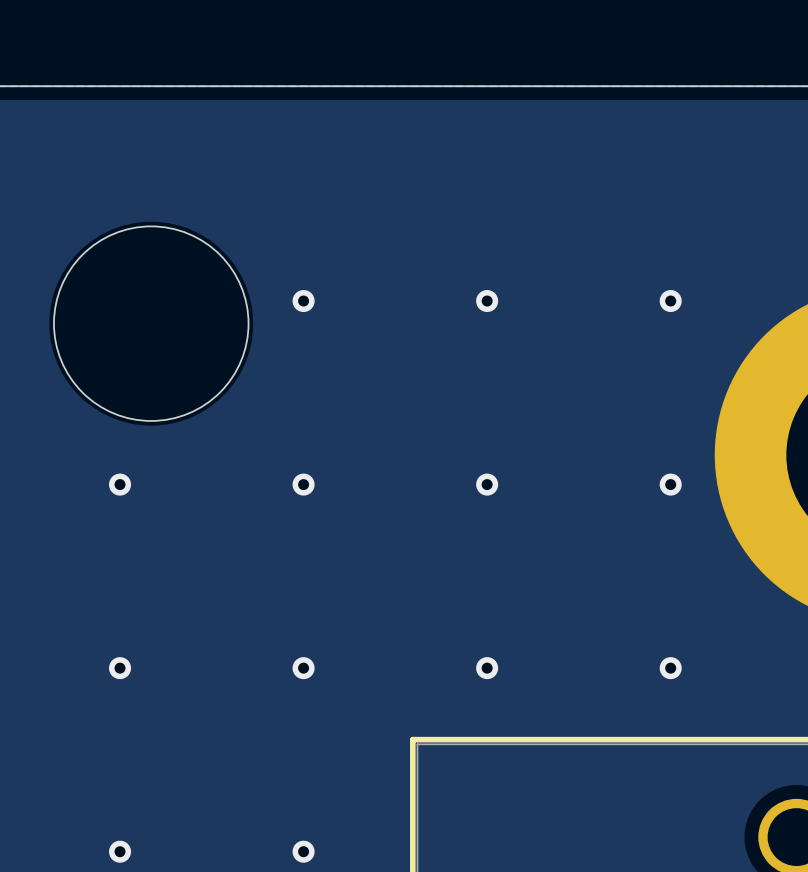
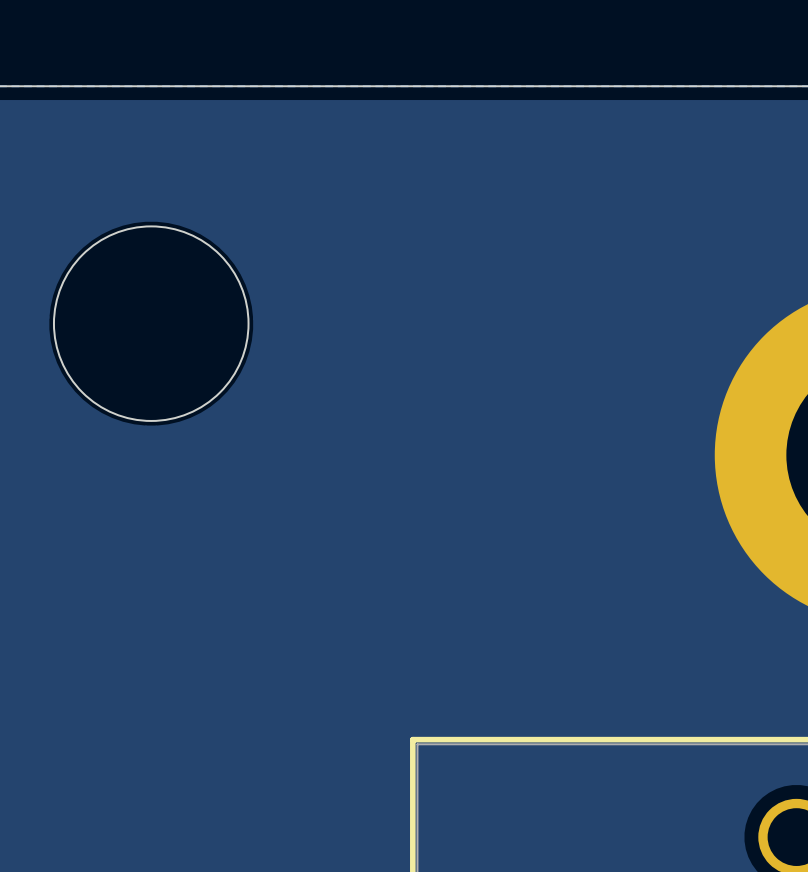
via: (303, 301) -> none
via: (487, 301) -> none
via: (670, 301) -> none
via: (120, 484) -> none
via: (303, 484) -> none
via: (487, 484) -> none
via: (670, 484) -> none
via: (120, 668) -> none
via: (303, 668) -> none
via: (487, 668) -> none
via: (670, 668) -> none
via: (120, 851) -> none
via: (303, 851) -> none

